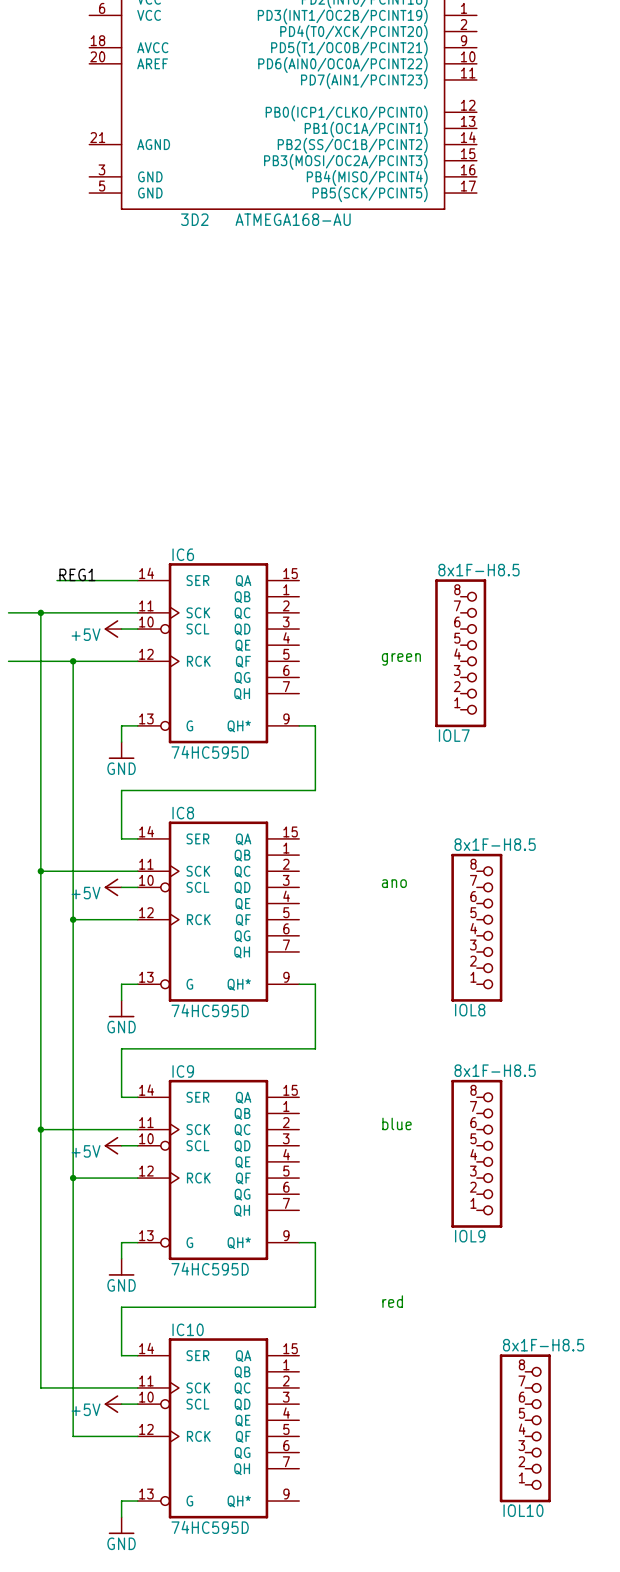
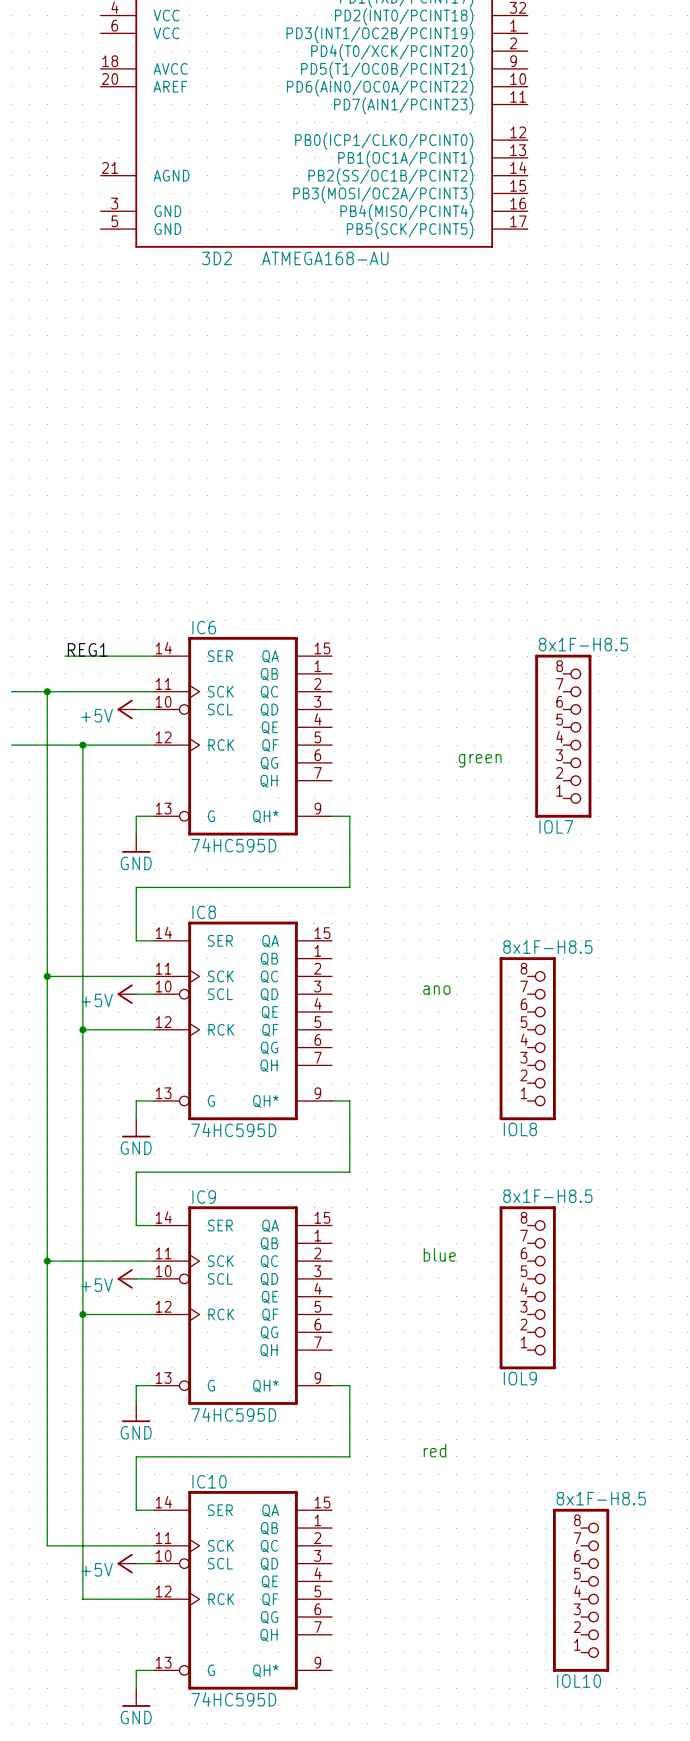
IOL7 position: (460, 653) -> (563, 736)
text position: green (401, 659) -> green (480, 760)

